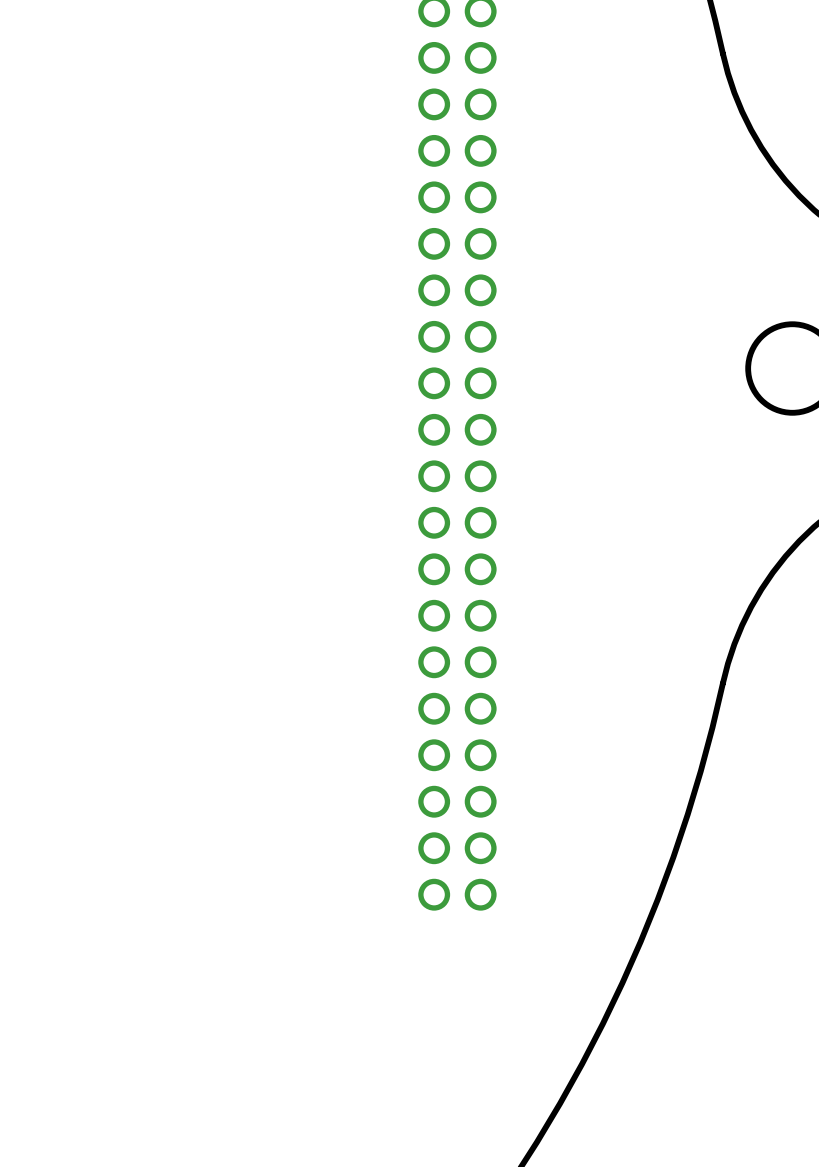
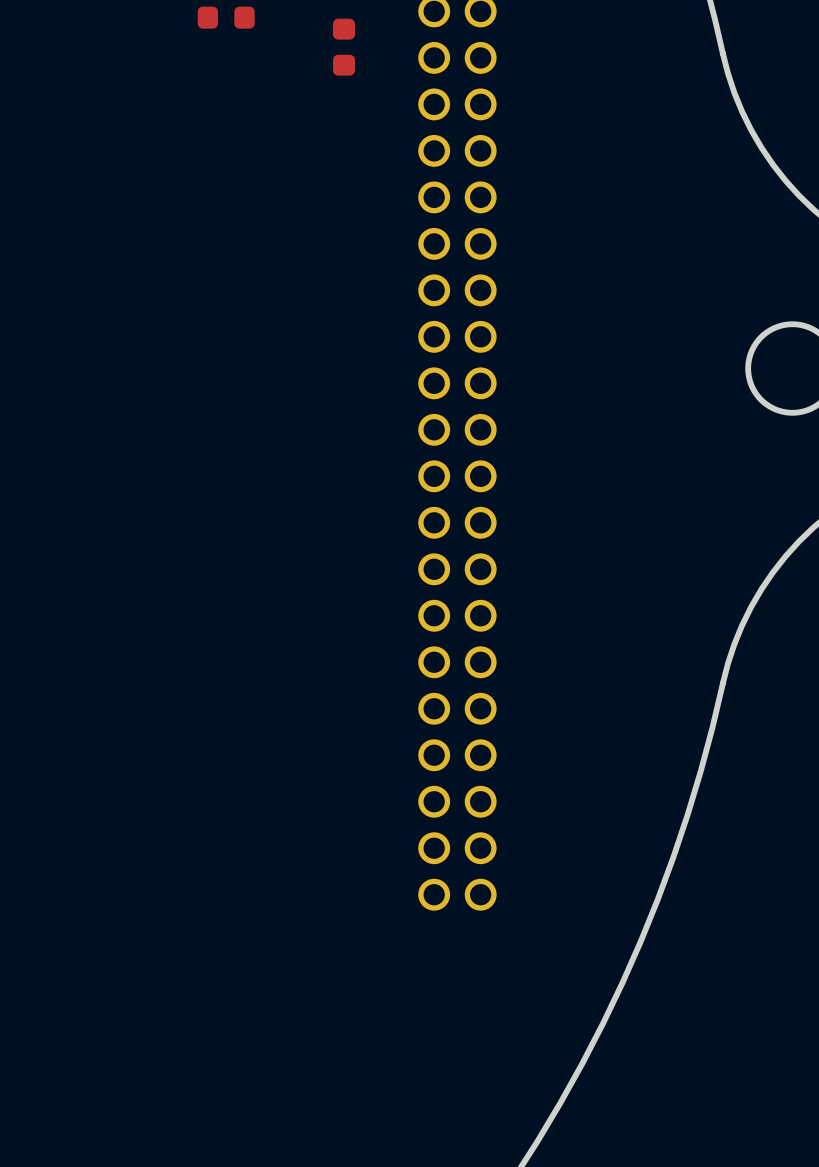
part: none -> (226, 17)
part: none -> (343, 47)

